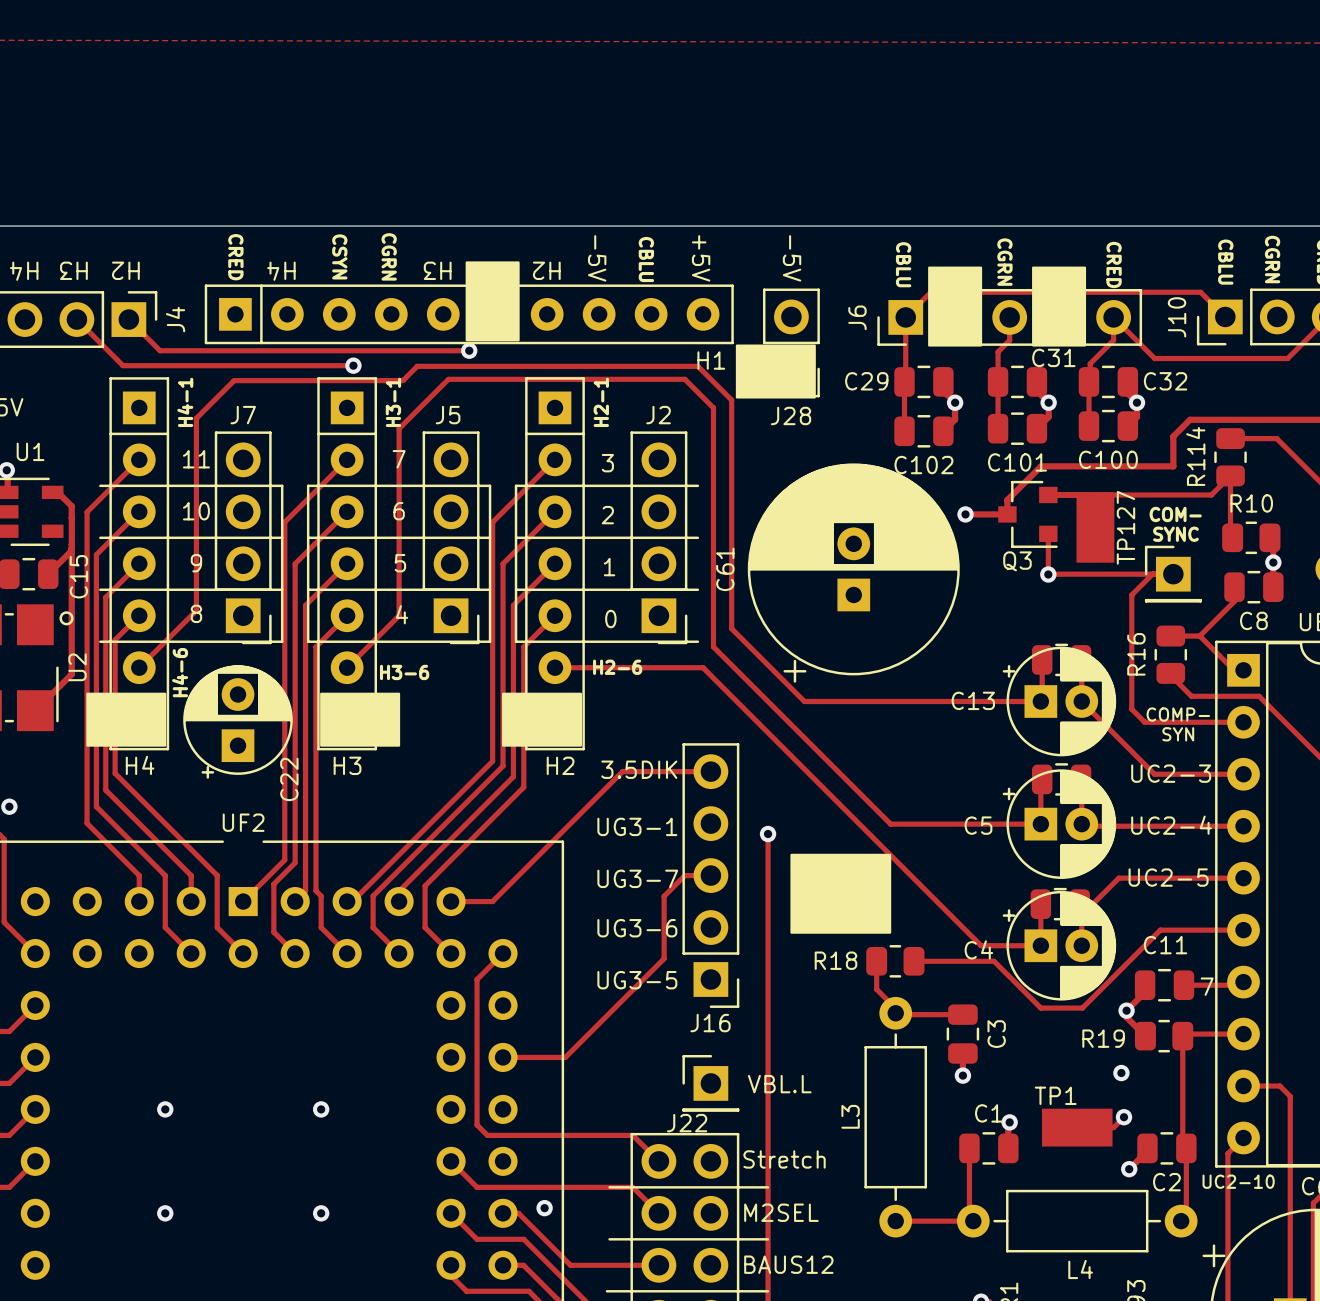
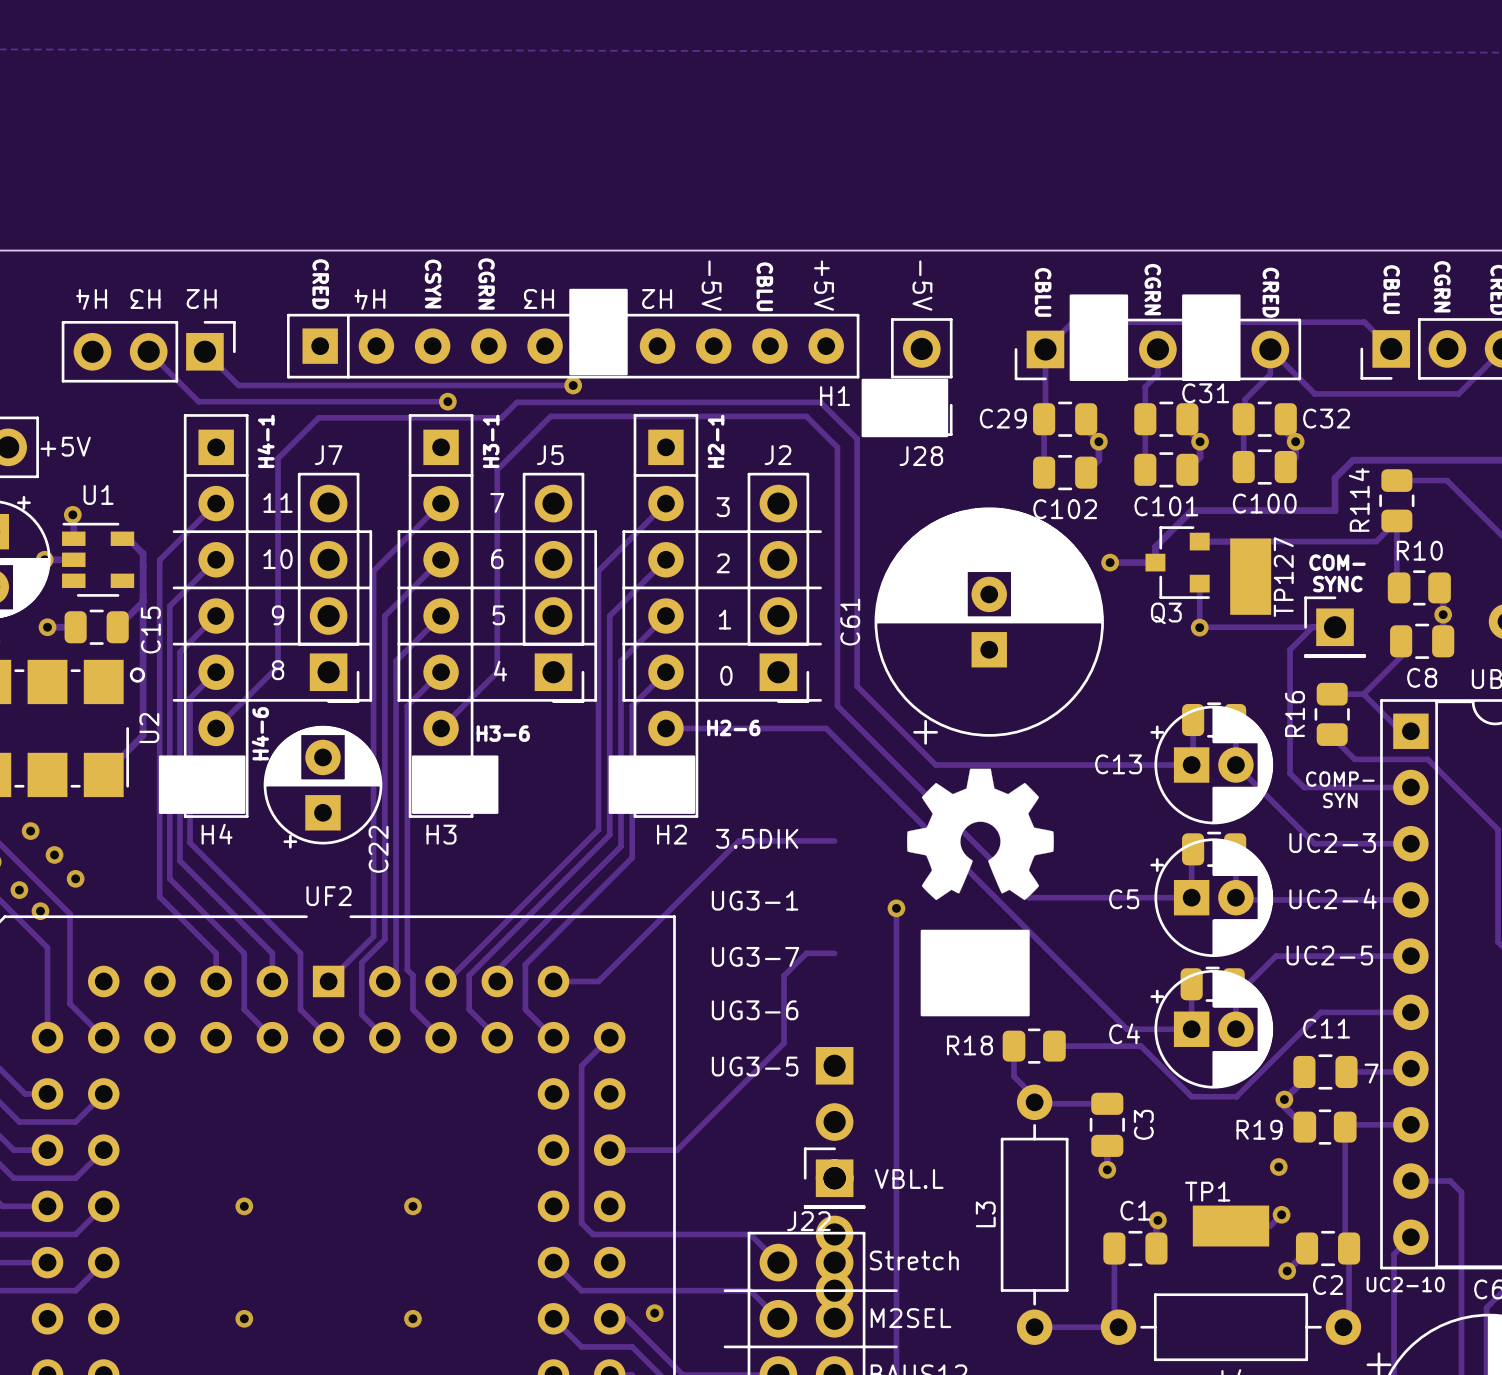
J6 name: J6 (857, 317) -> none
J10 name: J10 (1177, 317) -> none
J4 name: J4 (175, 319) -> none
drawing: none -> [907, 768, 1054, 901]
J16 side: top (710, 875) -> bottom (834, 1178)

